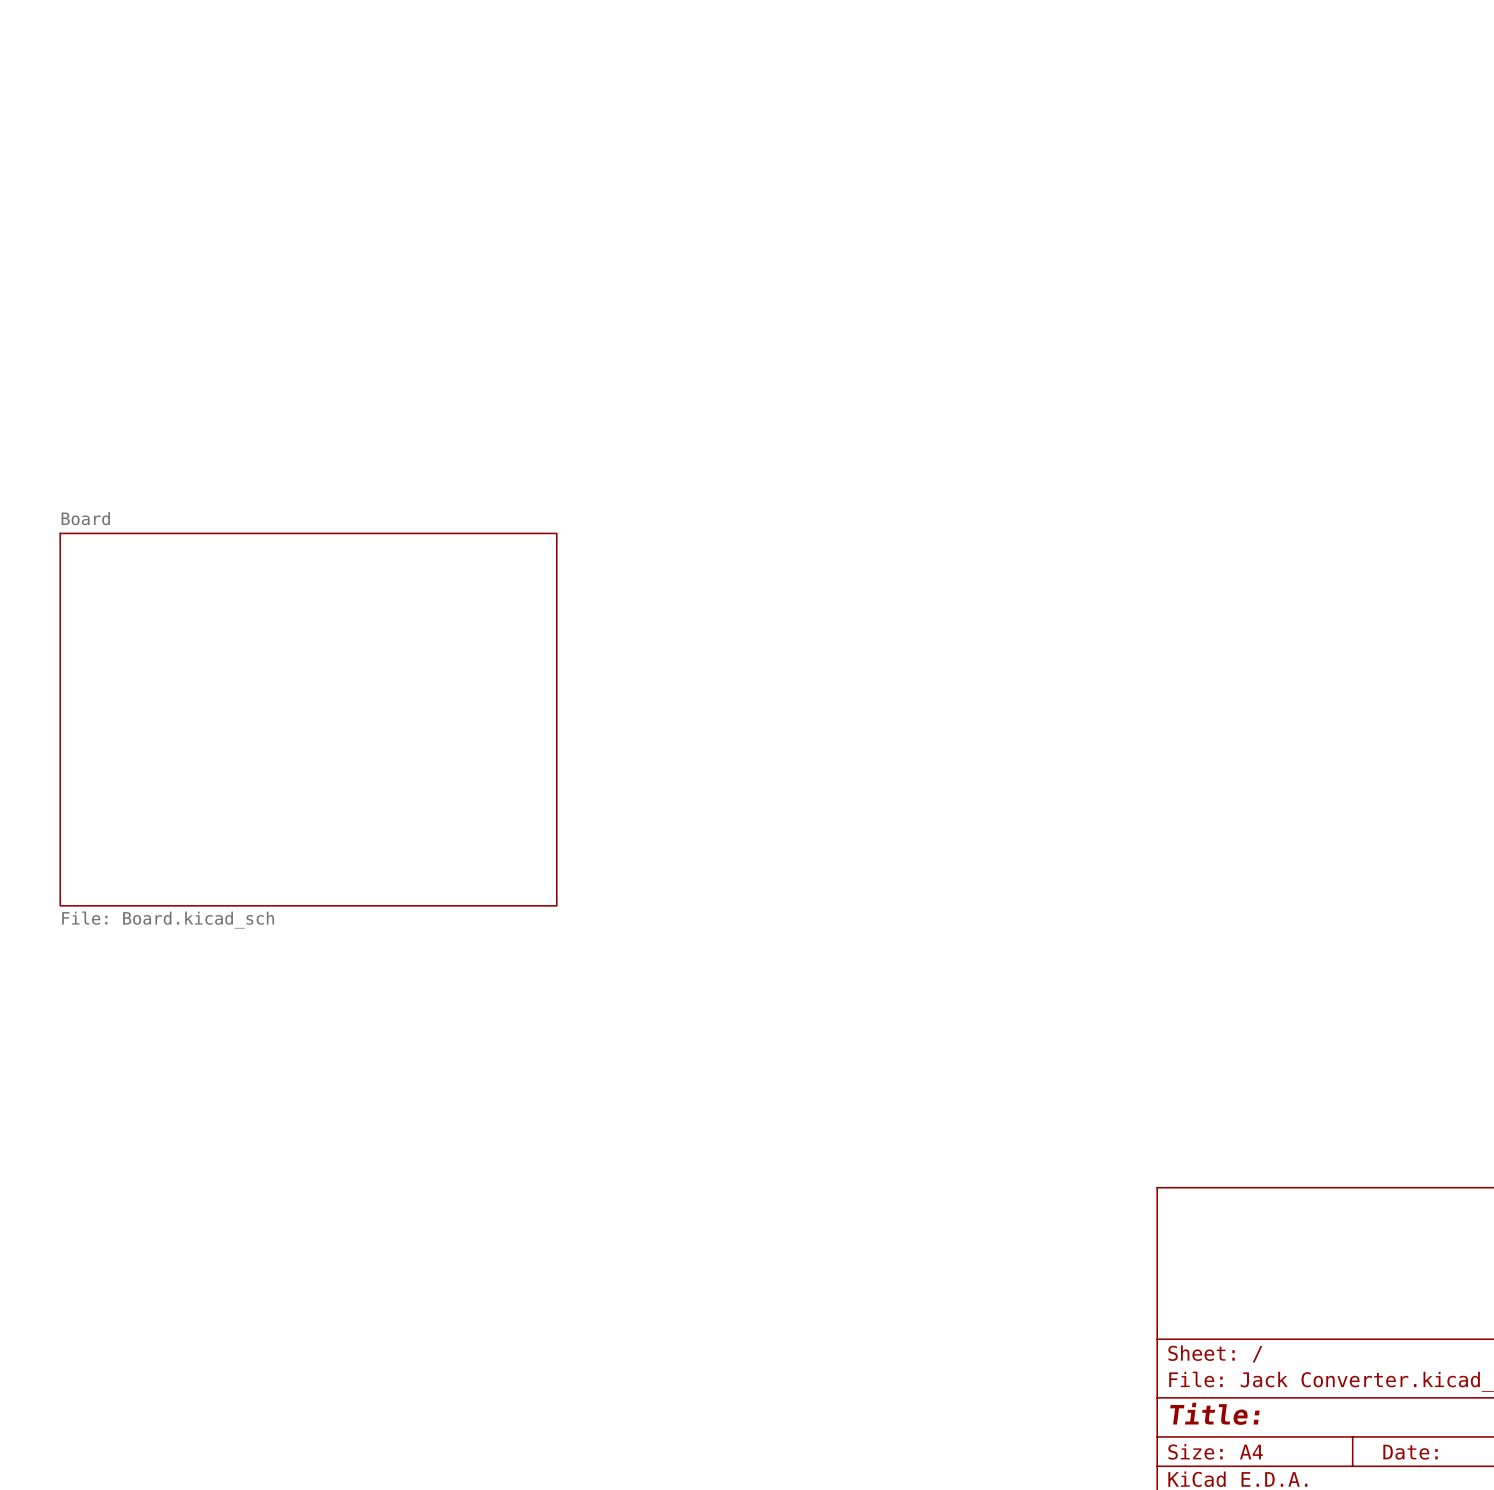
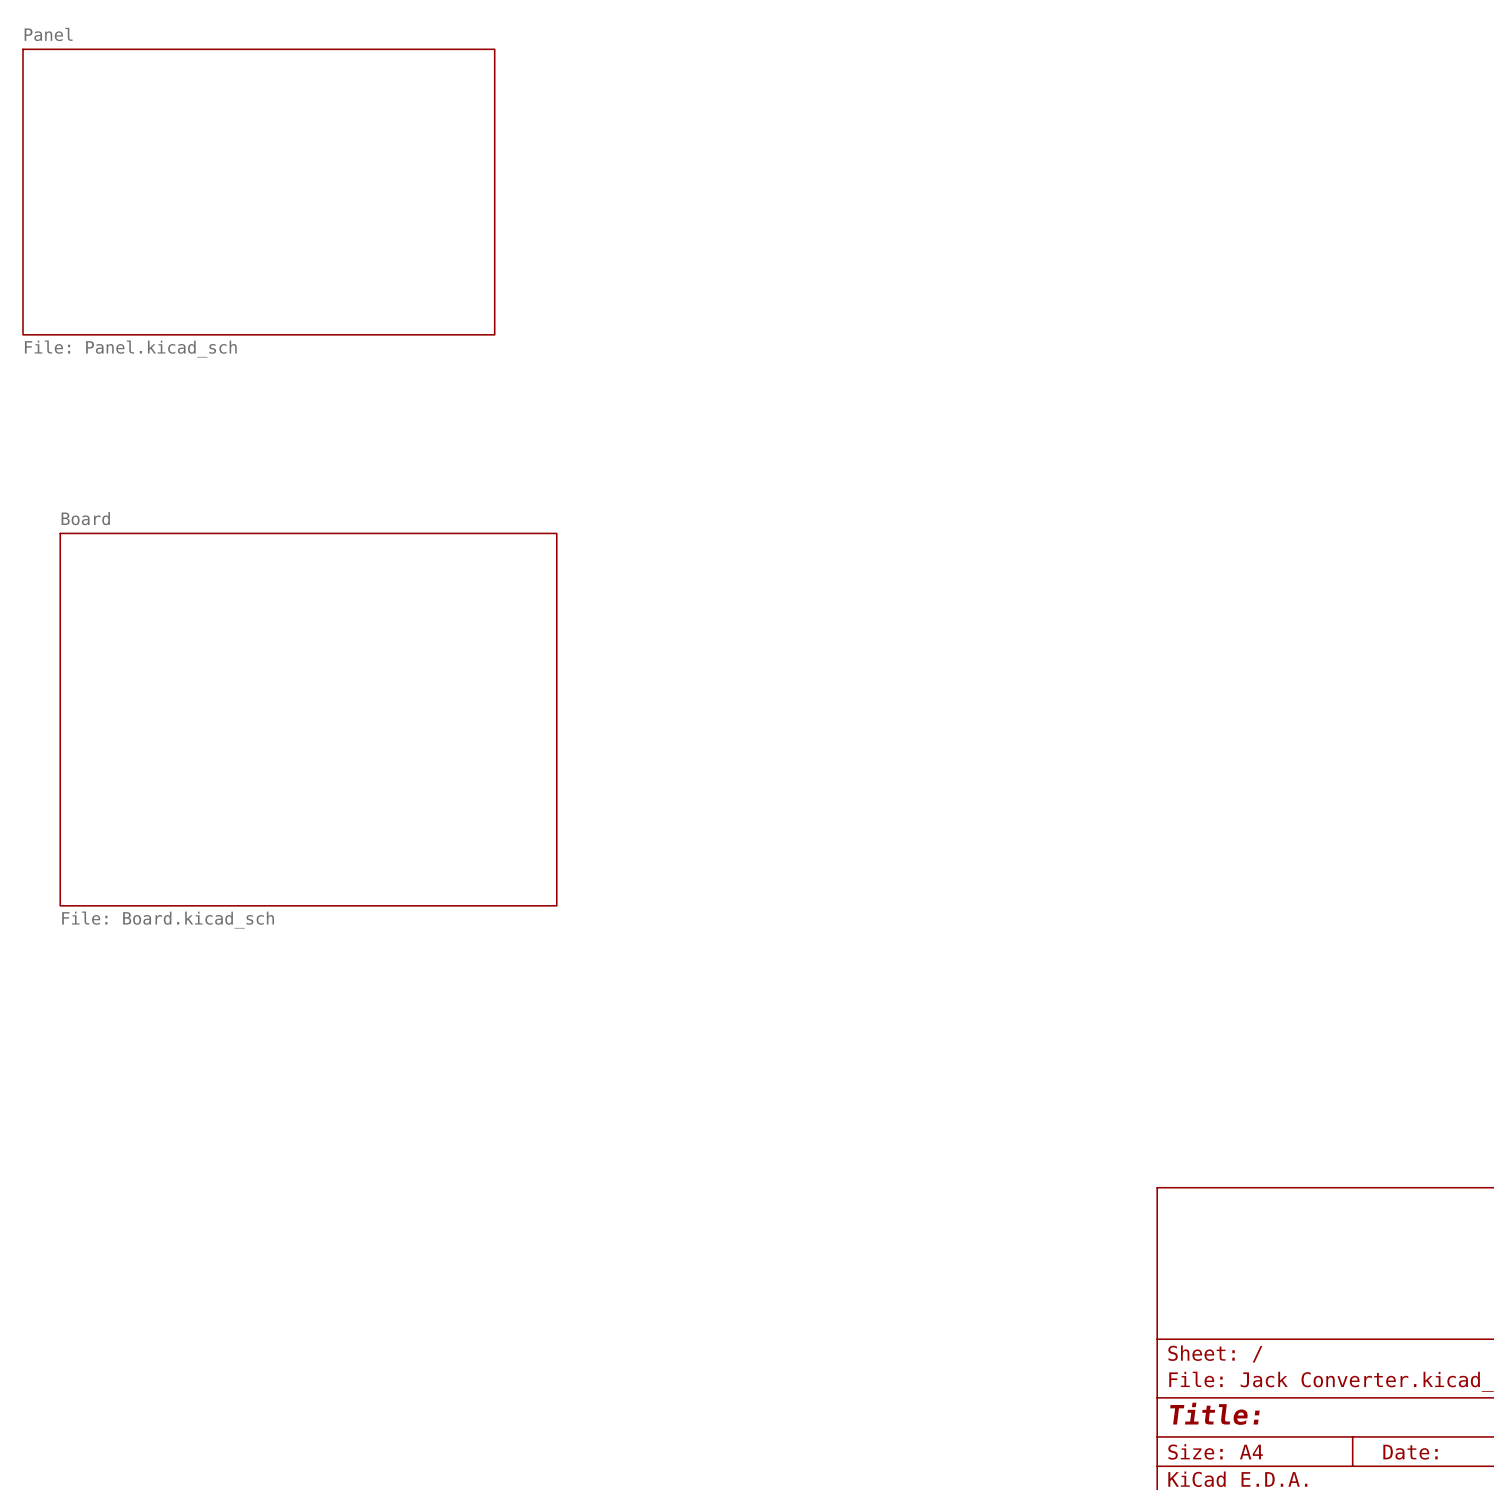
sheet Panel: none -> File: Panel.kicad_sch (258, 192)

